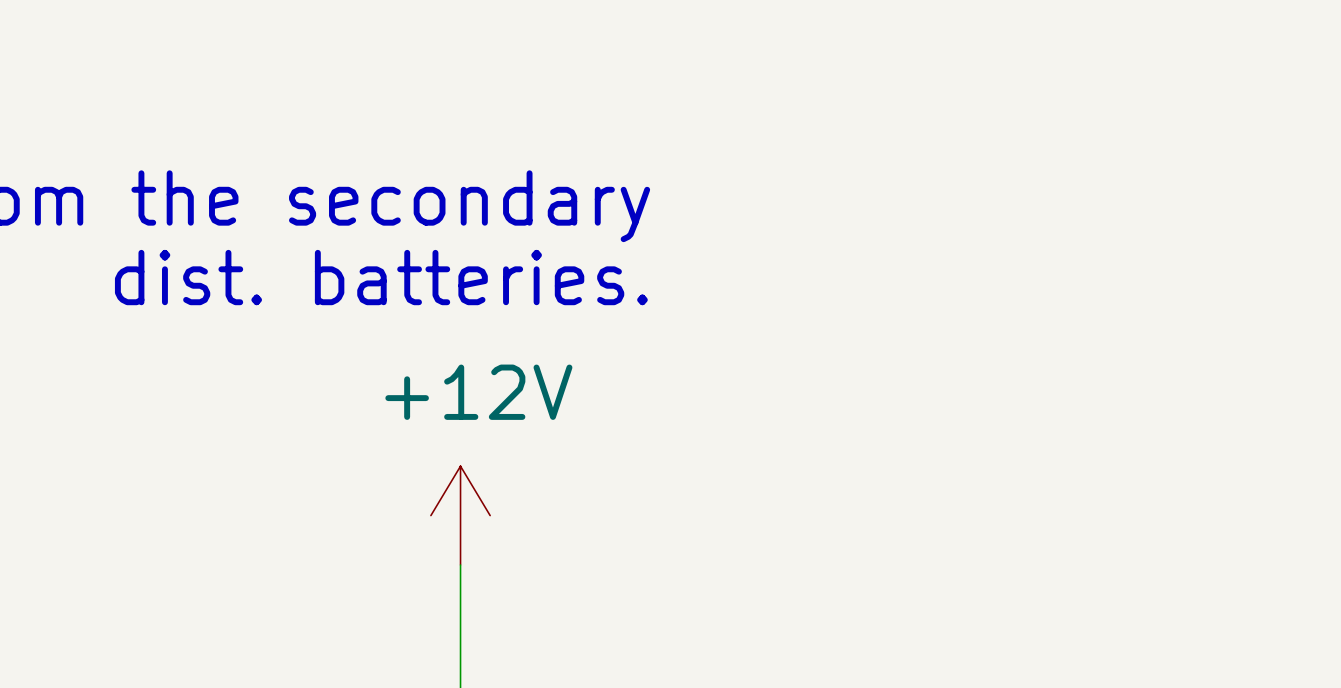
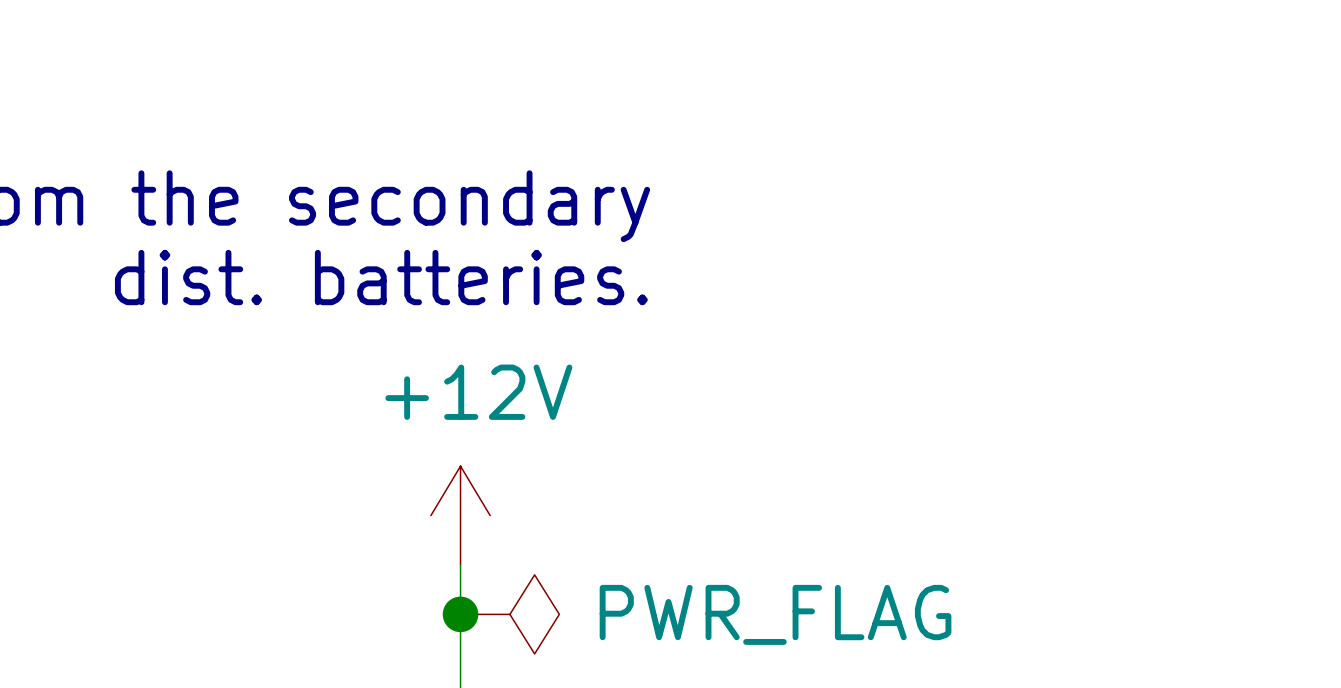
junction: none -> (460, 614)
power symbol: none -> PWR_FLAG (509, 614)

